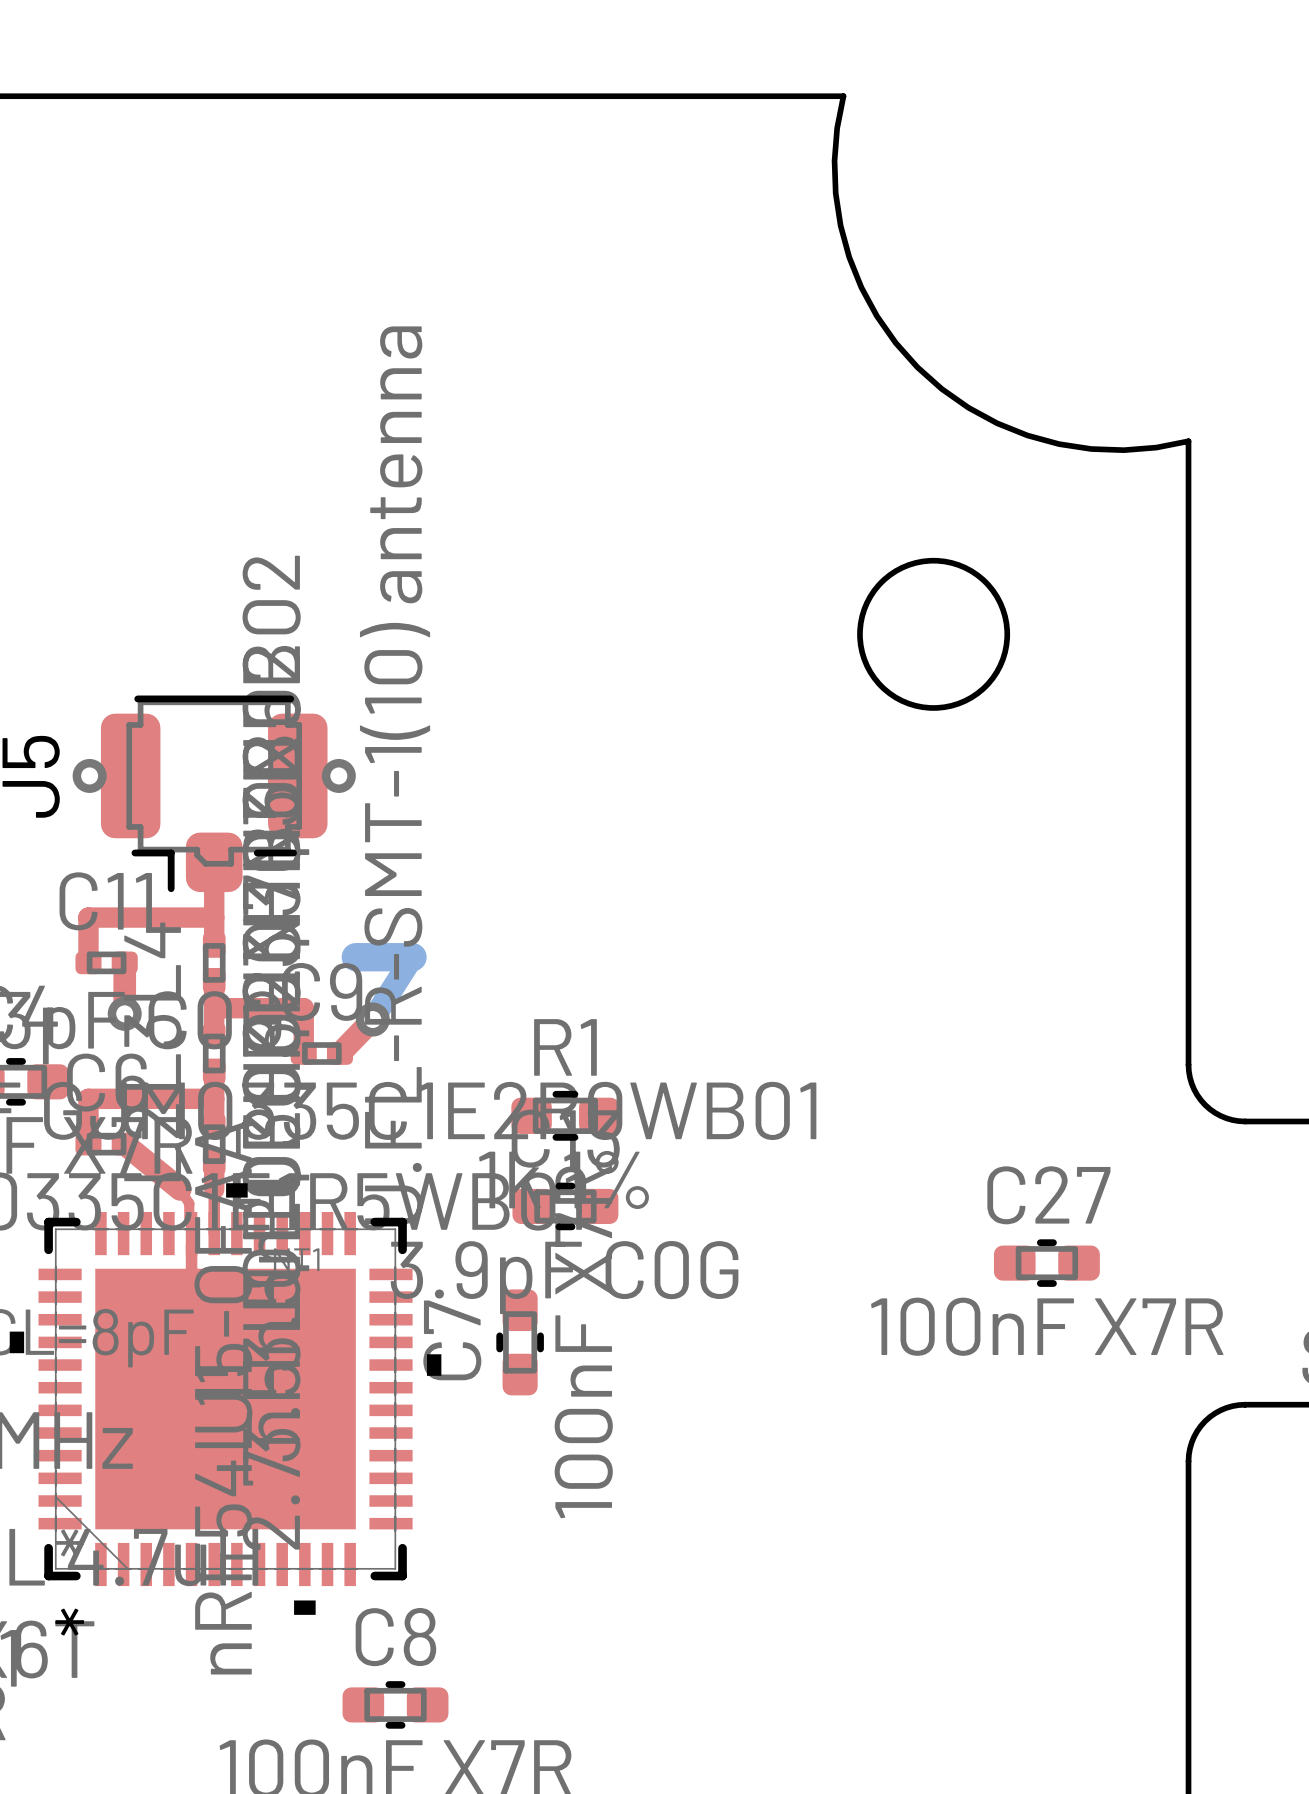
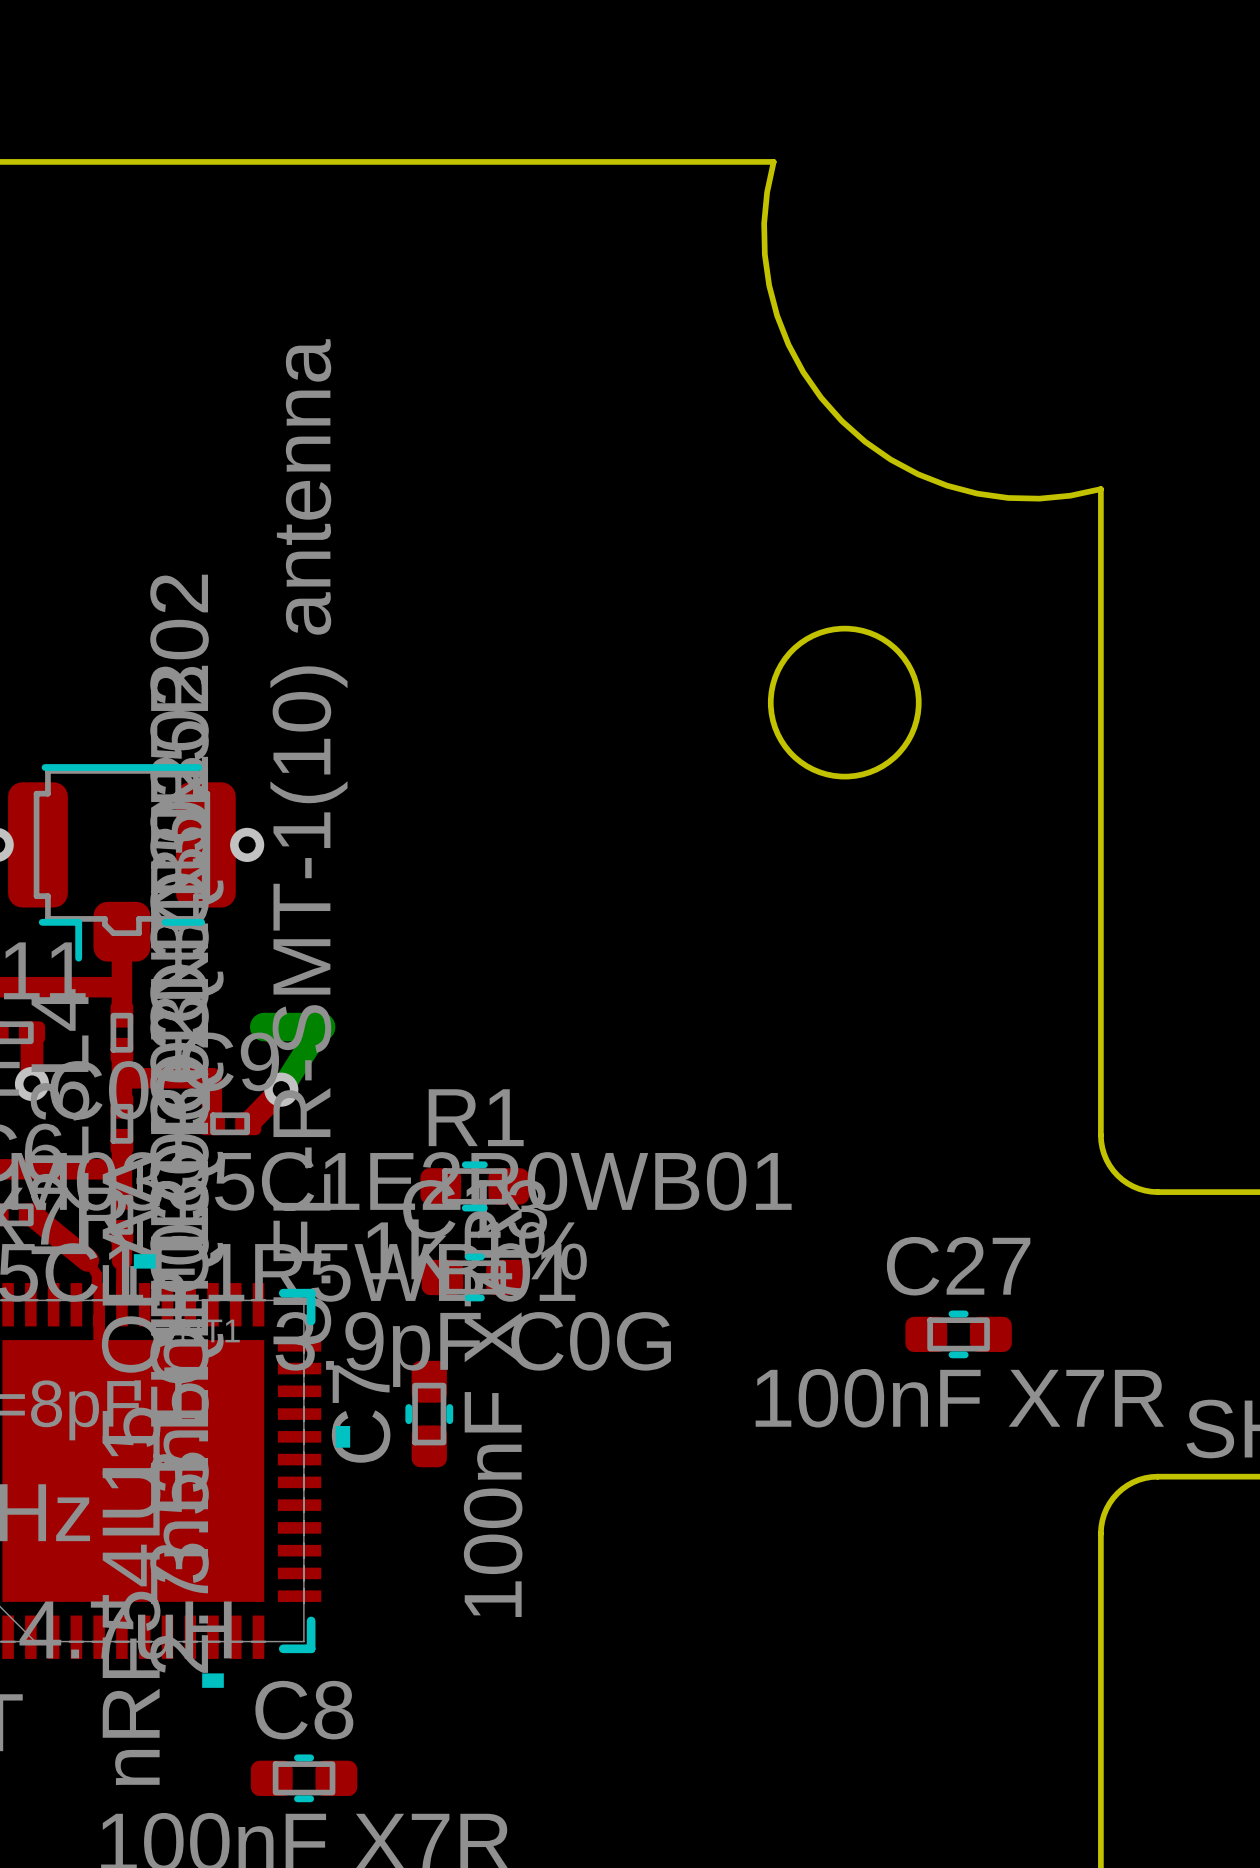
board edge: (843, 96) (837, 128) (834, 160) (835, 193) (840, 225) (849, 257) (861, 287) (876, 316) (895, 342) (917, 367) (941, 389) (968, 407) (997, 423) (1027, 435) (1059, 444) (1091, 449) (1123, 450) (1156, 447) (1188, 441) -> (754, 161) (773, 161) (767, 192) (764, 223) (764, 254) (769, 285) (777, 315) (788, 344) (803, 372) (821, 397) (841, 421) (865, 441) (890, 459) (918, 474) (947, 485) (977, 493) (1008, 497) (1039, 498) (1070, 495) (1100, 489) (1100, 508)

